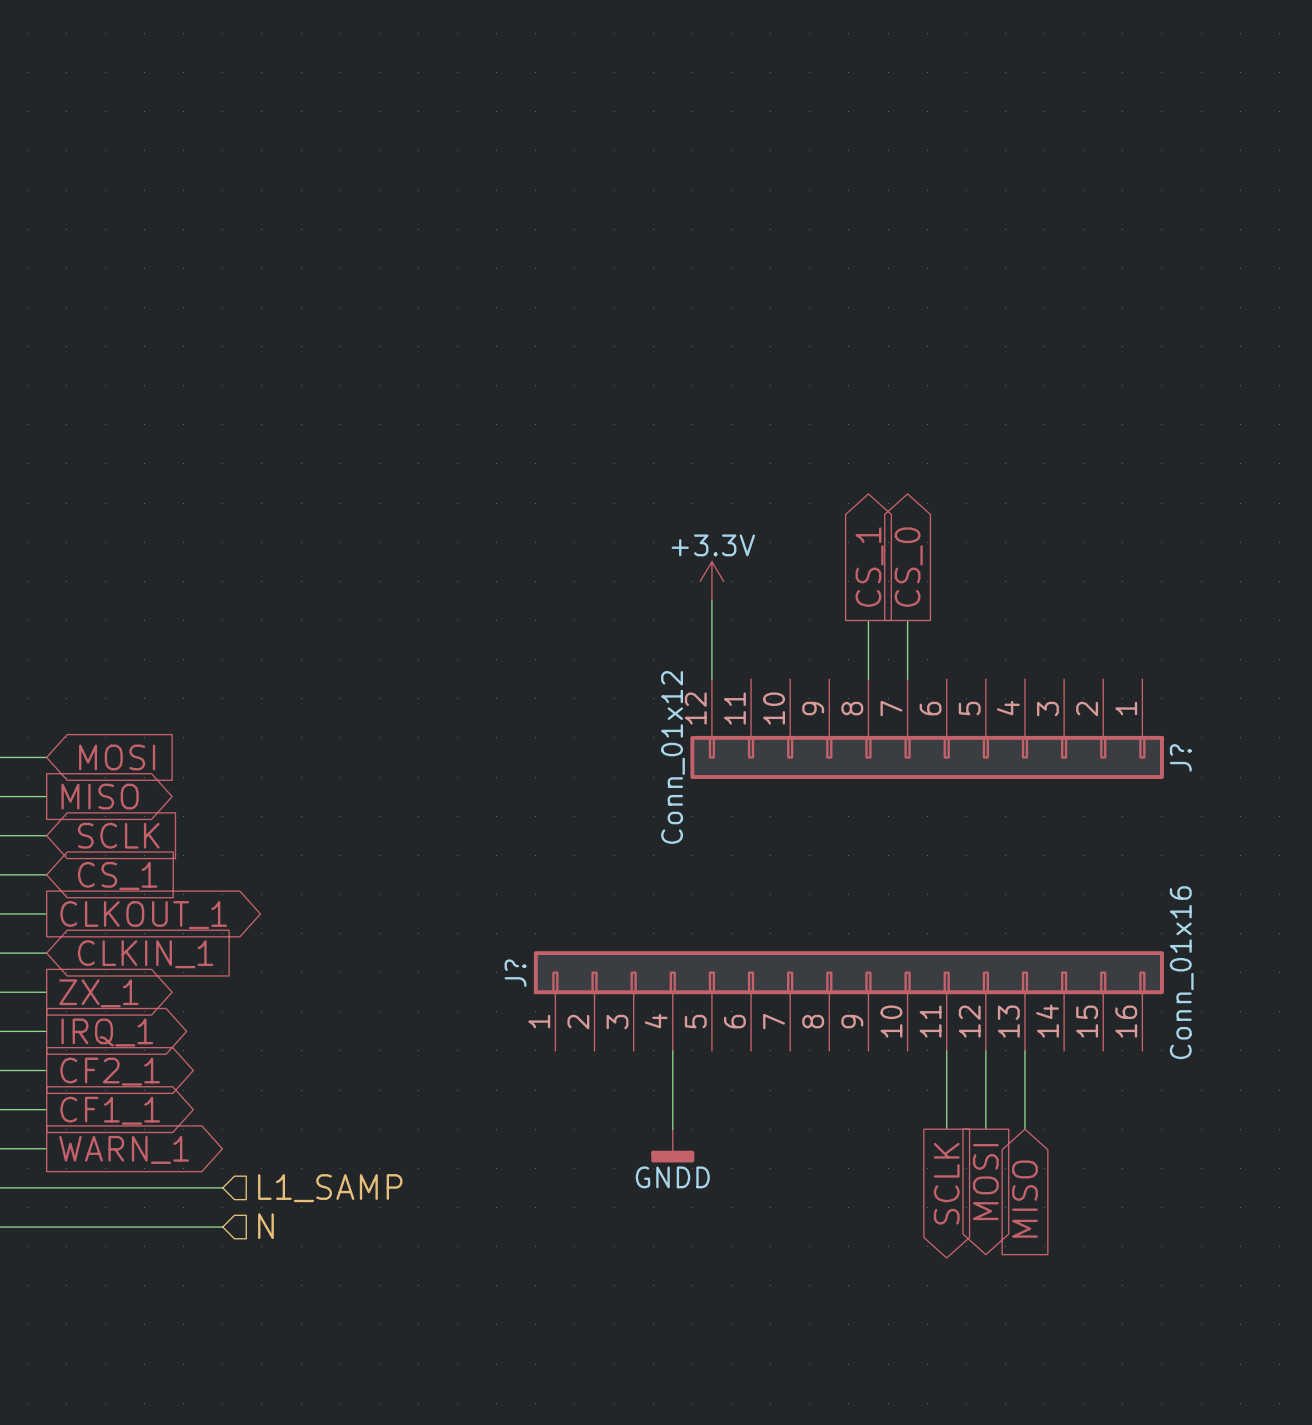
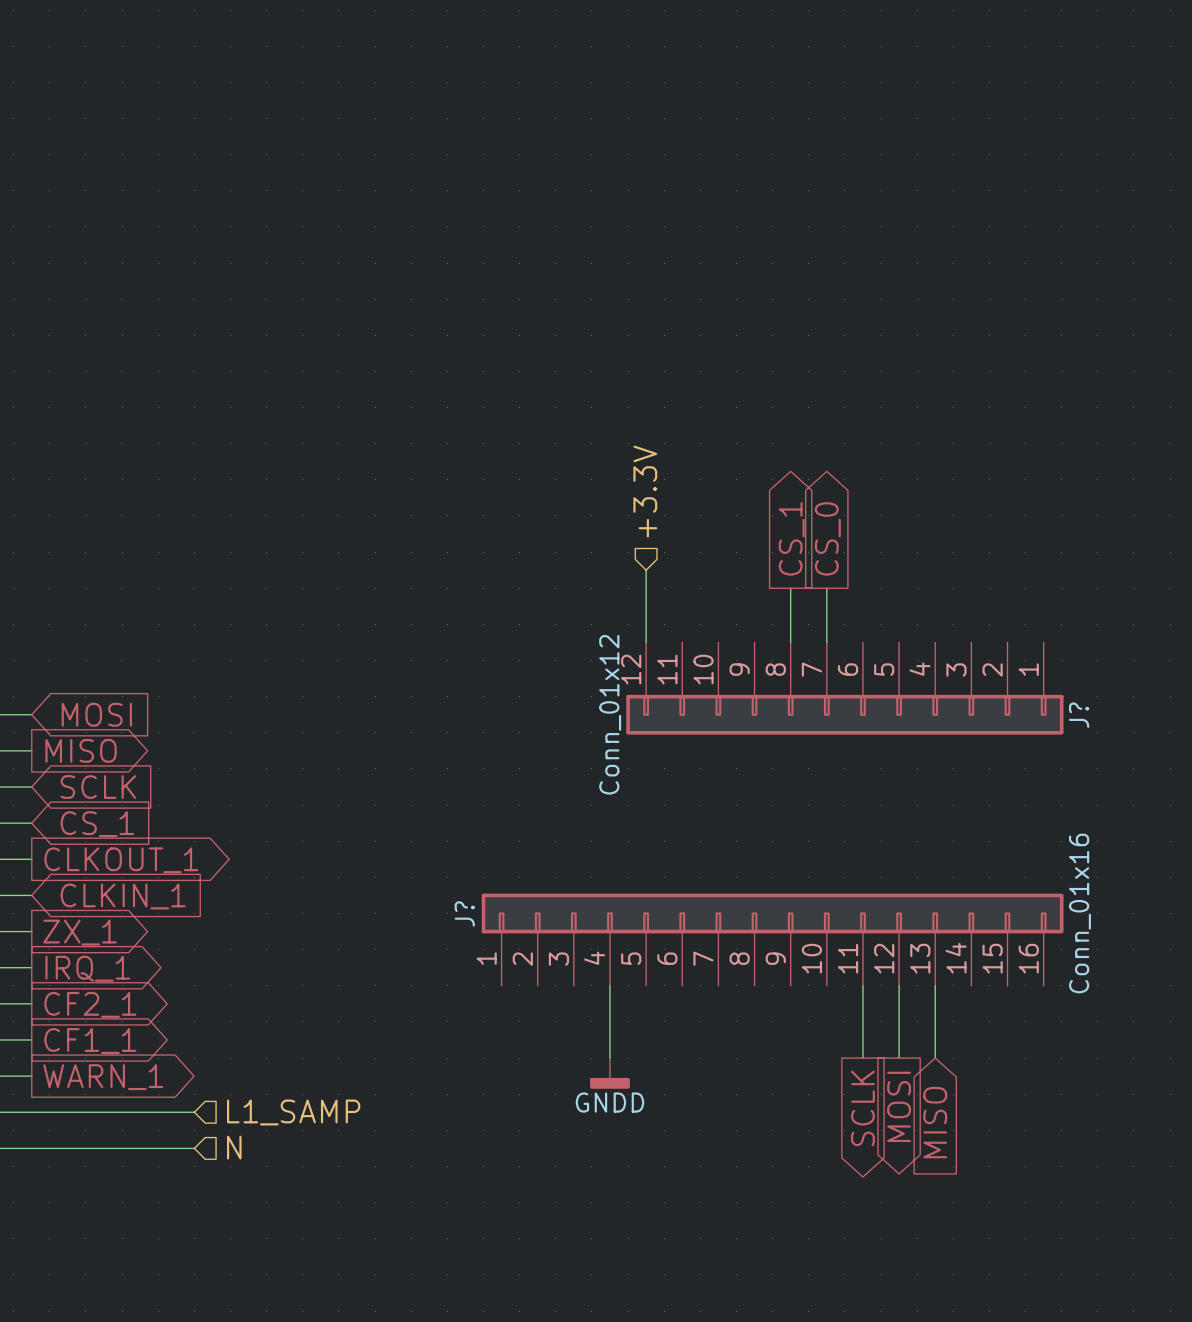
hierarchical label: none -> +3.3V (645, 491)
power symbol: +3.3V (711, 581) -> none

